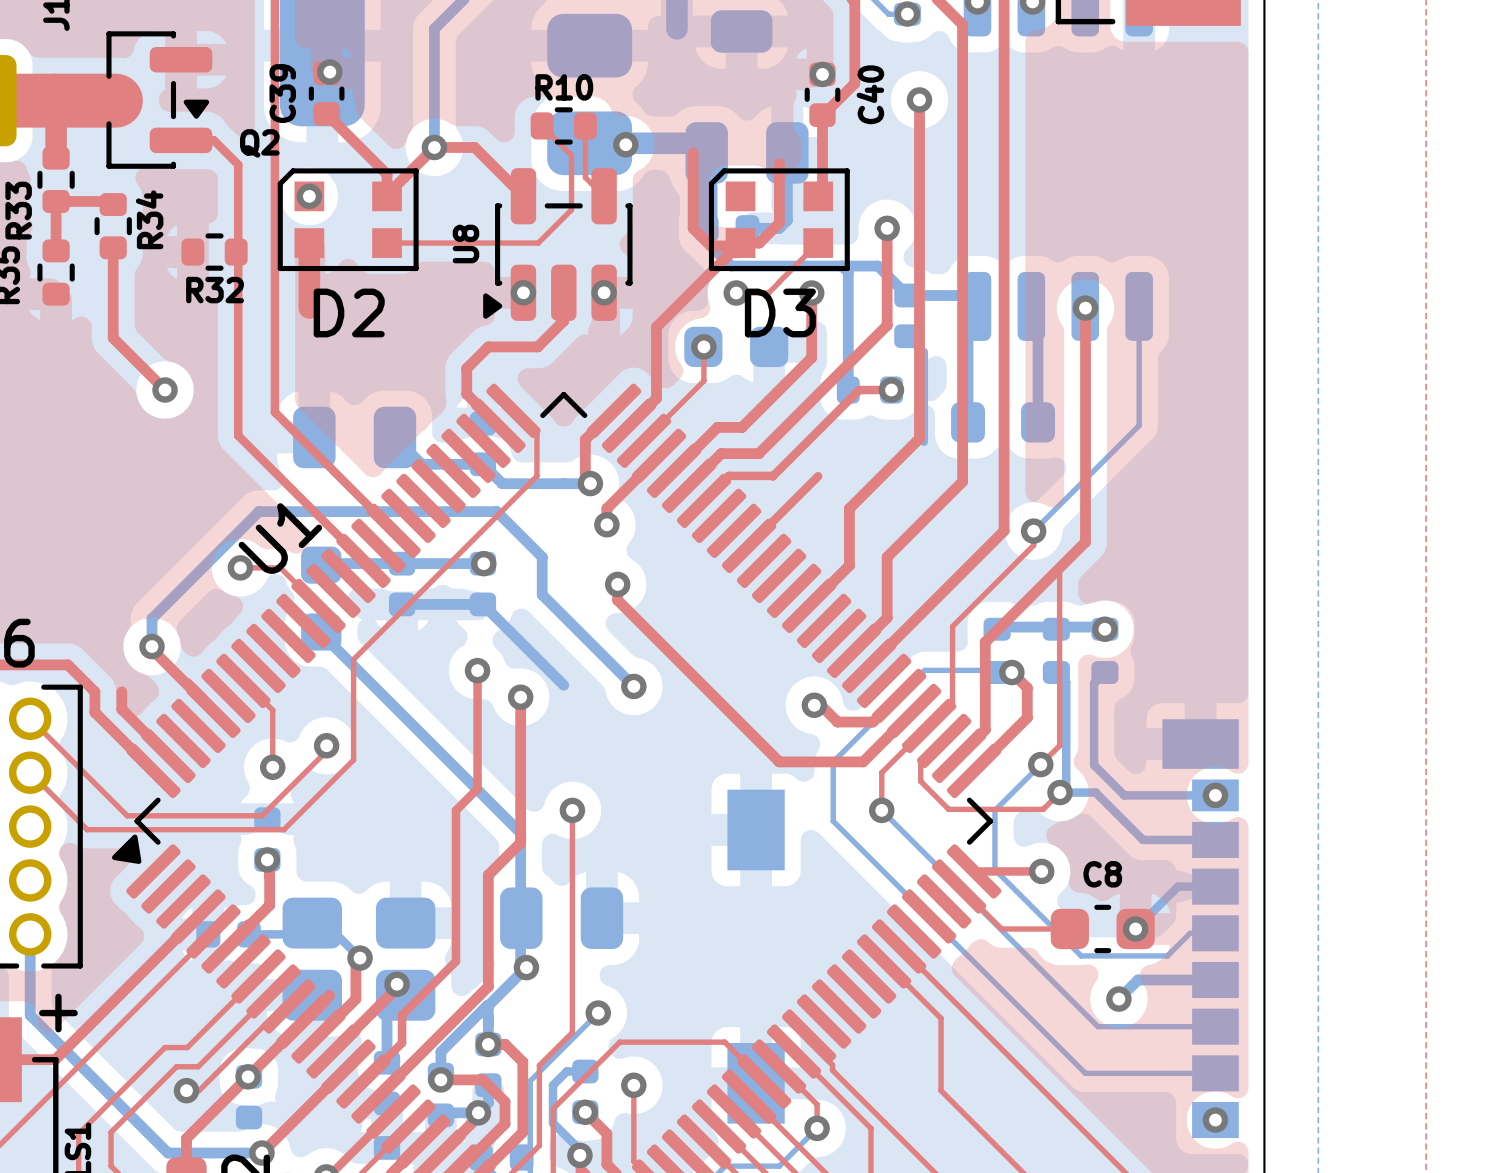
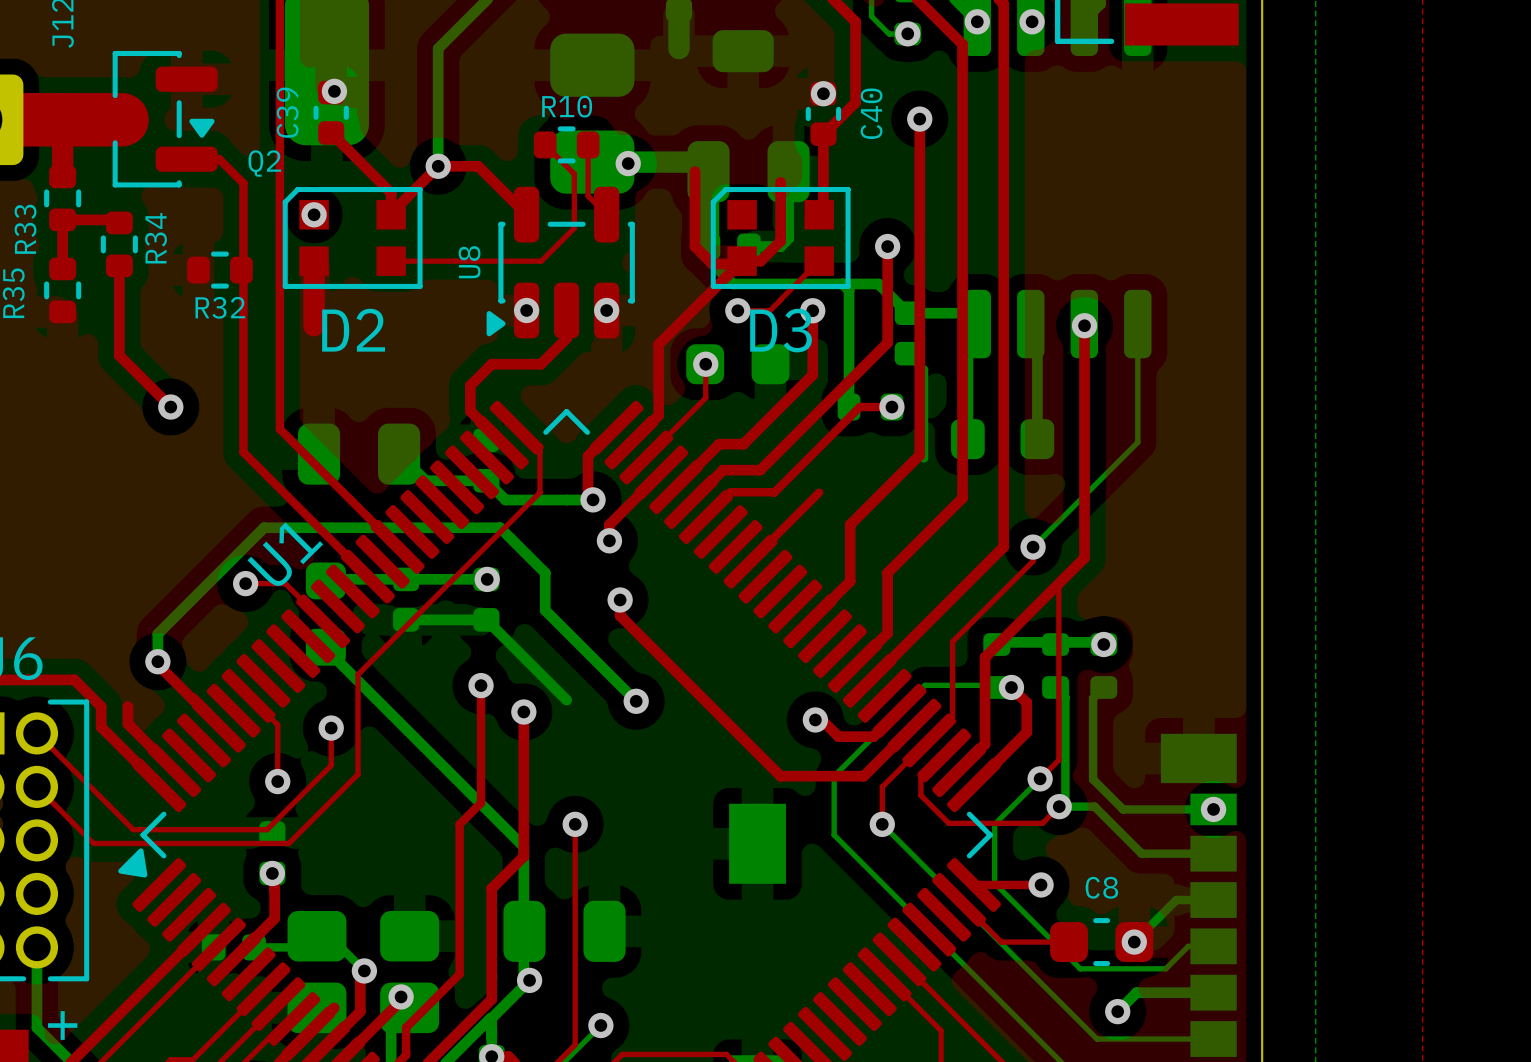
top track: none -> (331, 728) (331, 760)
via position: (326, 745) -> (331, 728)

